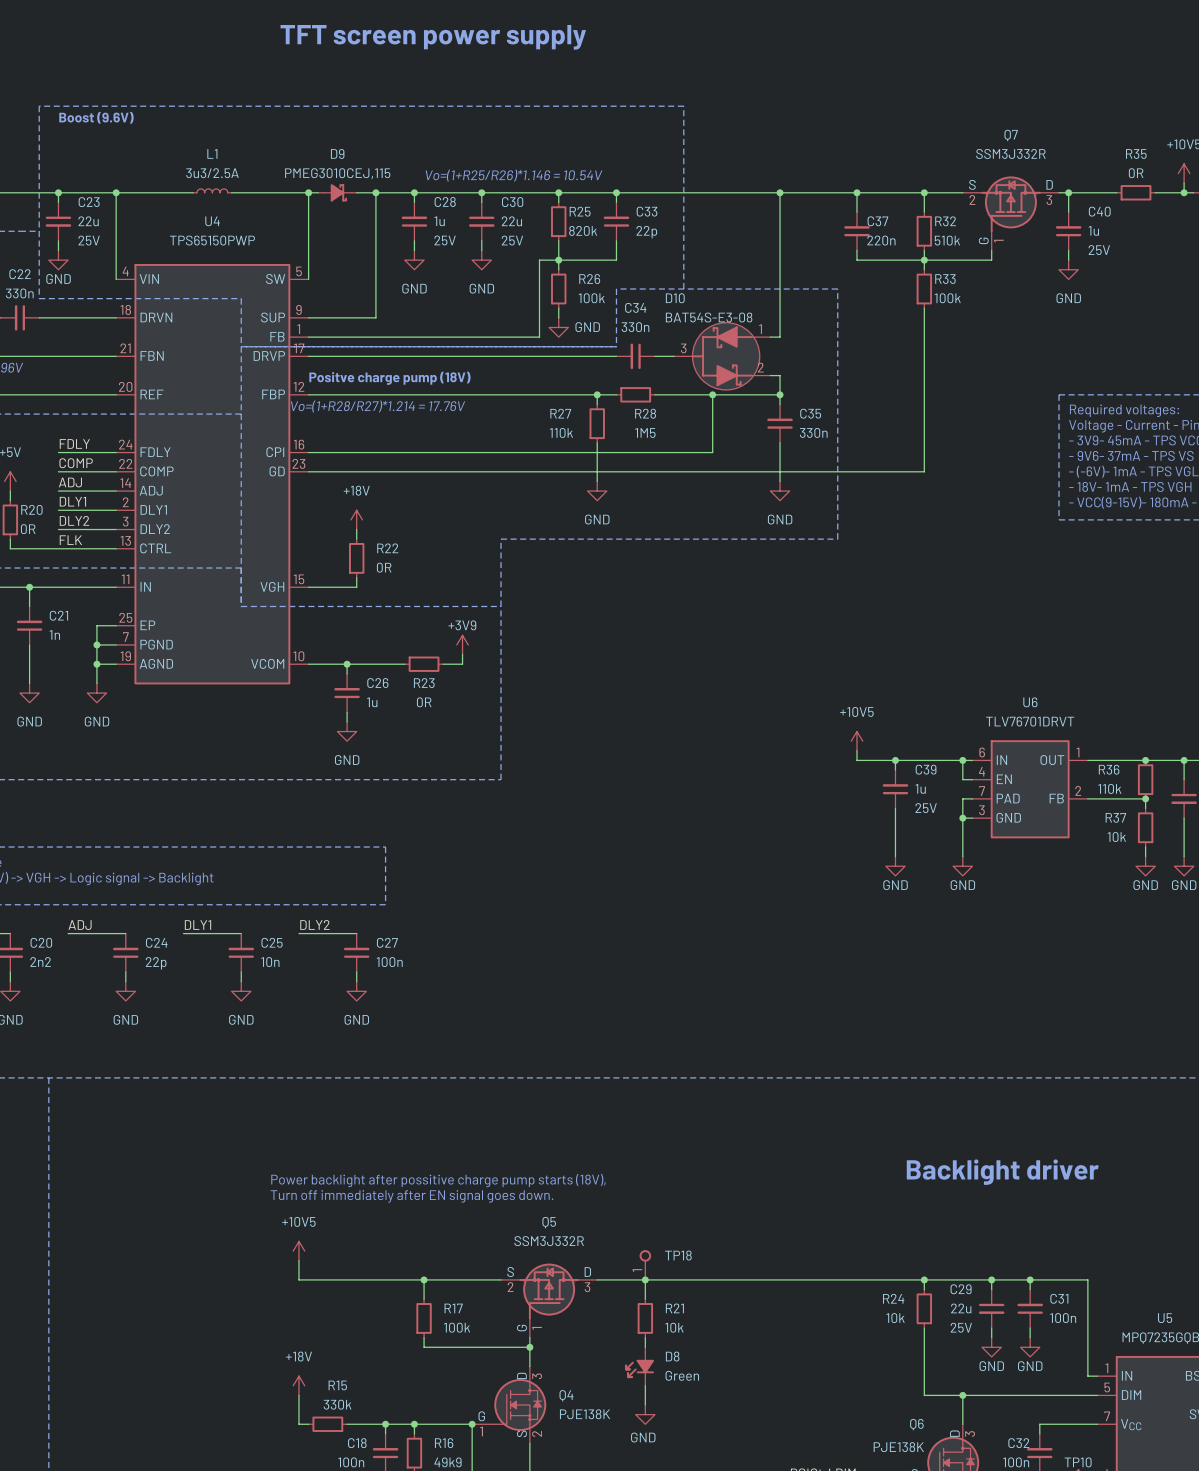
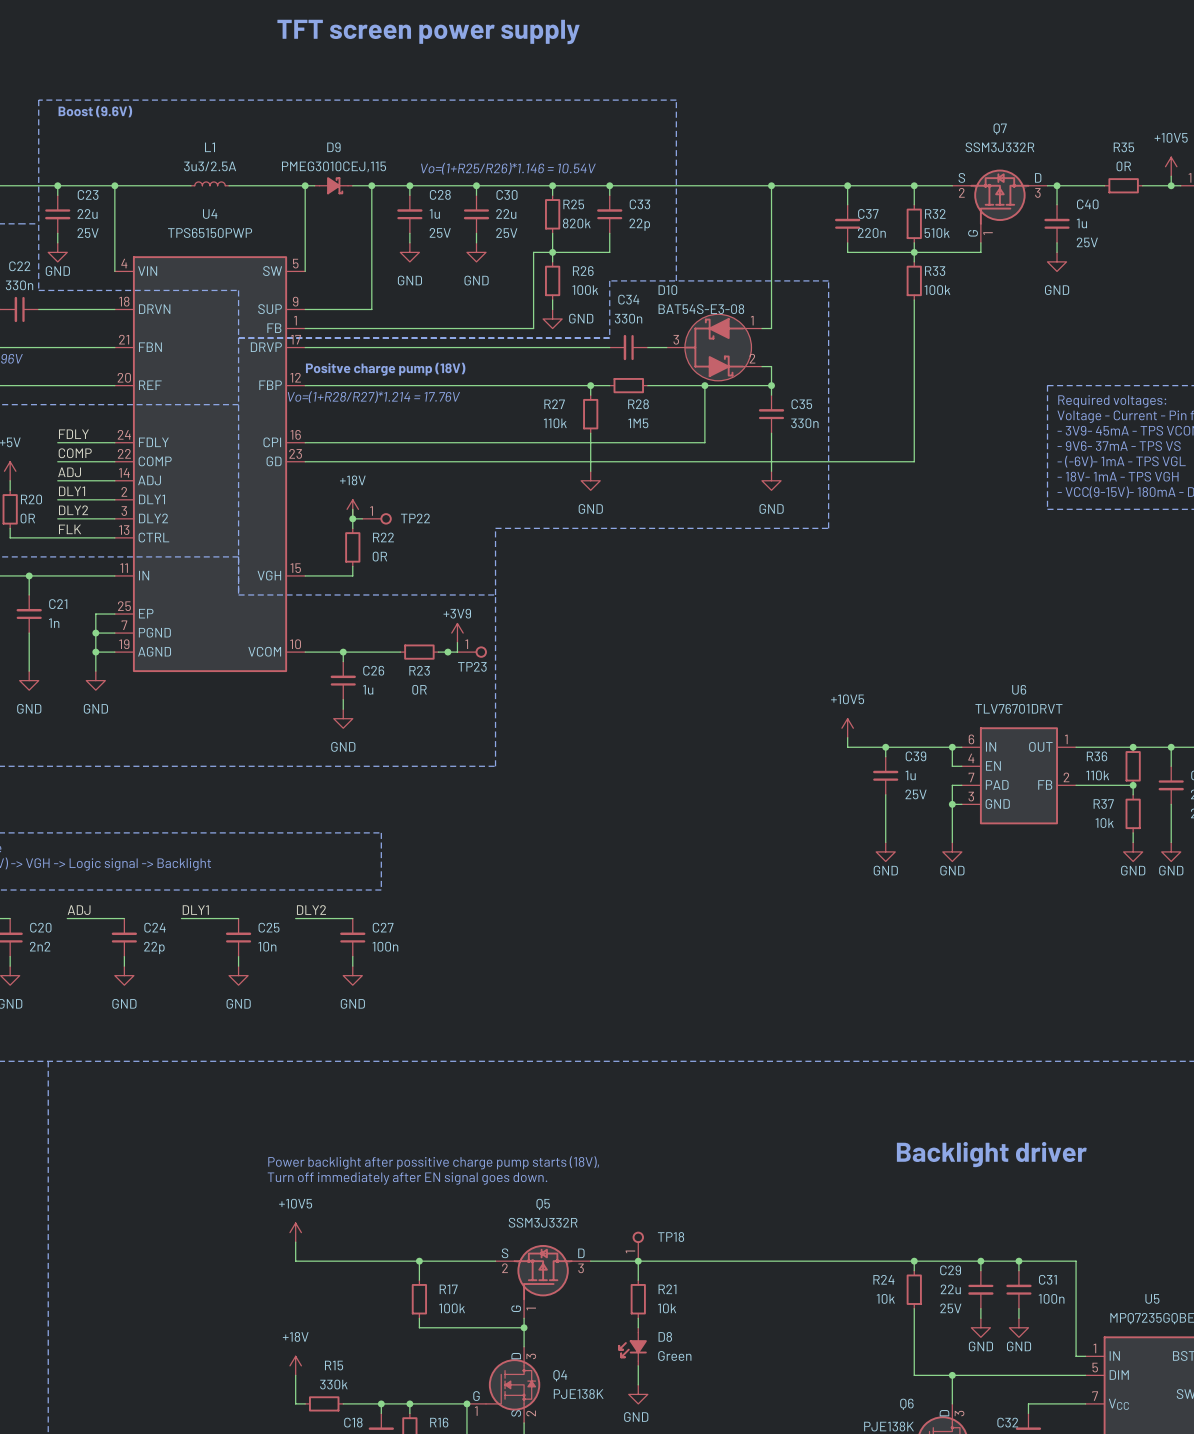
wire: none -> (352, 509) (352, 518) (362, 518)
junction: none -> (352, 518)
TP22: none -> (377, 518)
junction: none -> (447, 652)
TP23: none -> (472, 652)

